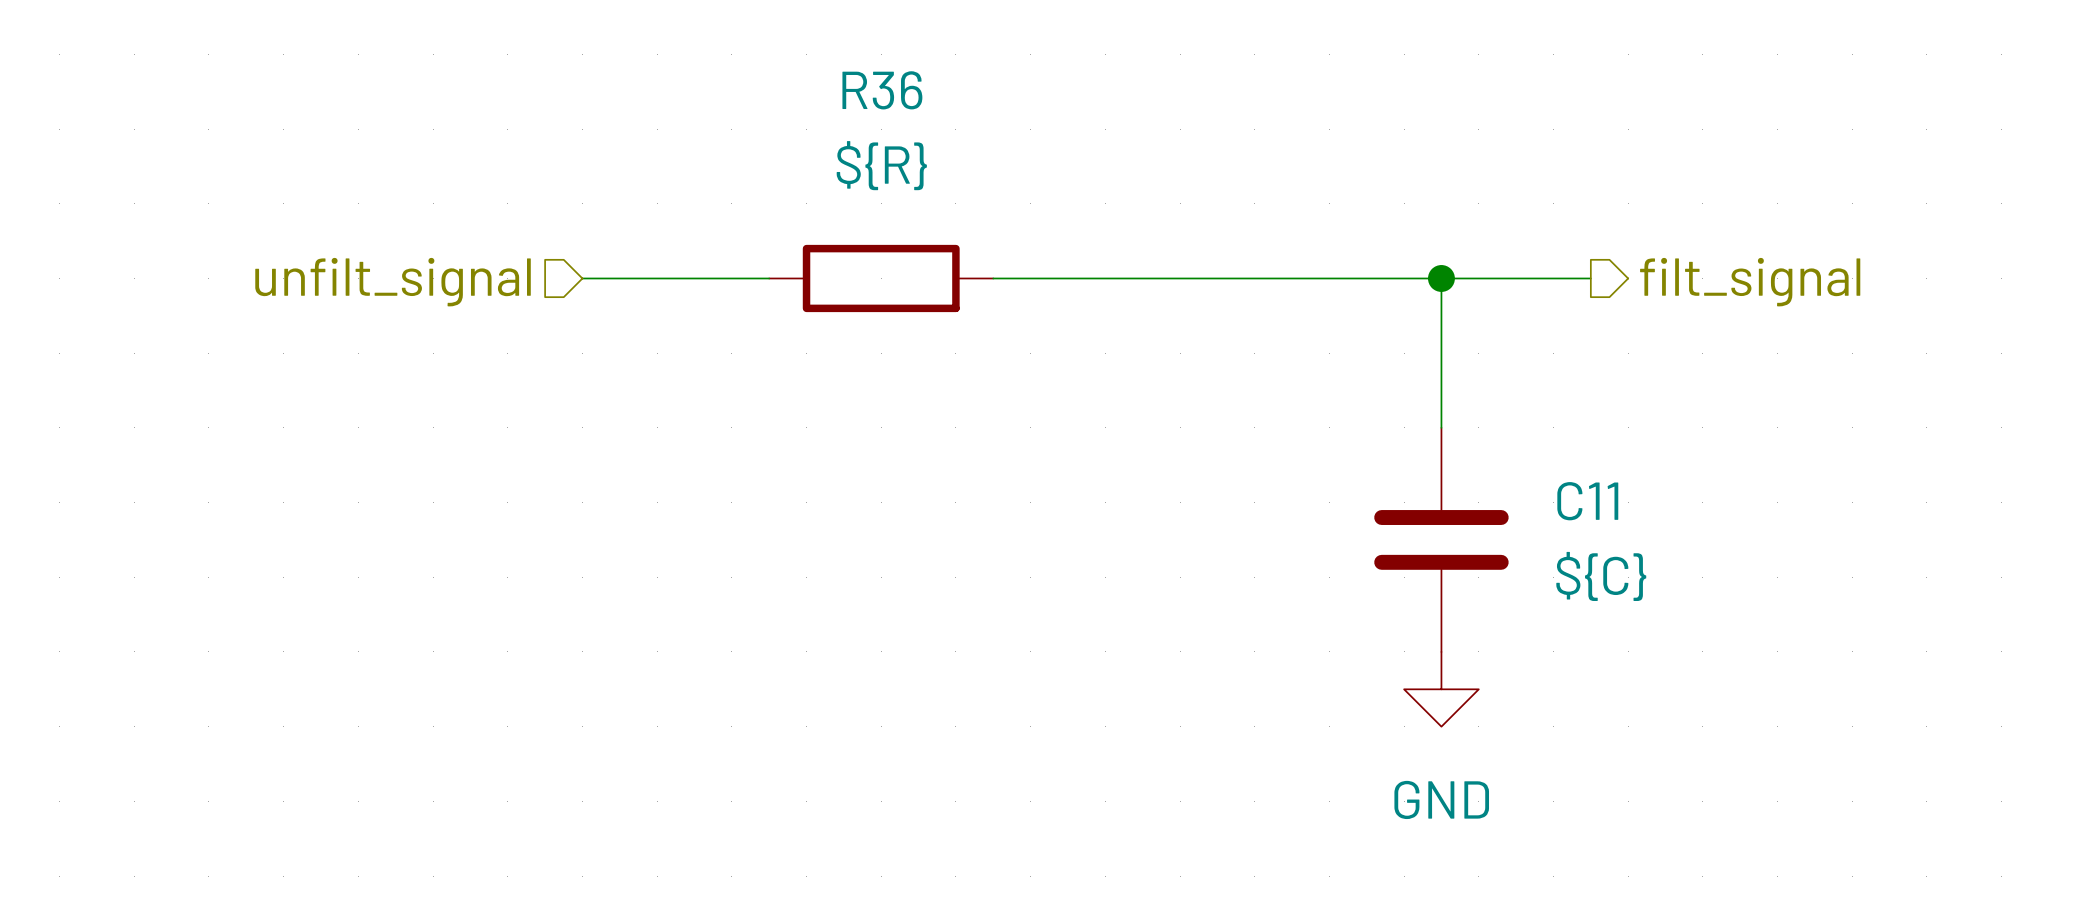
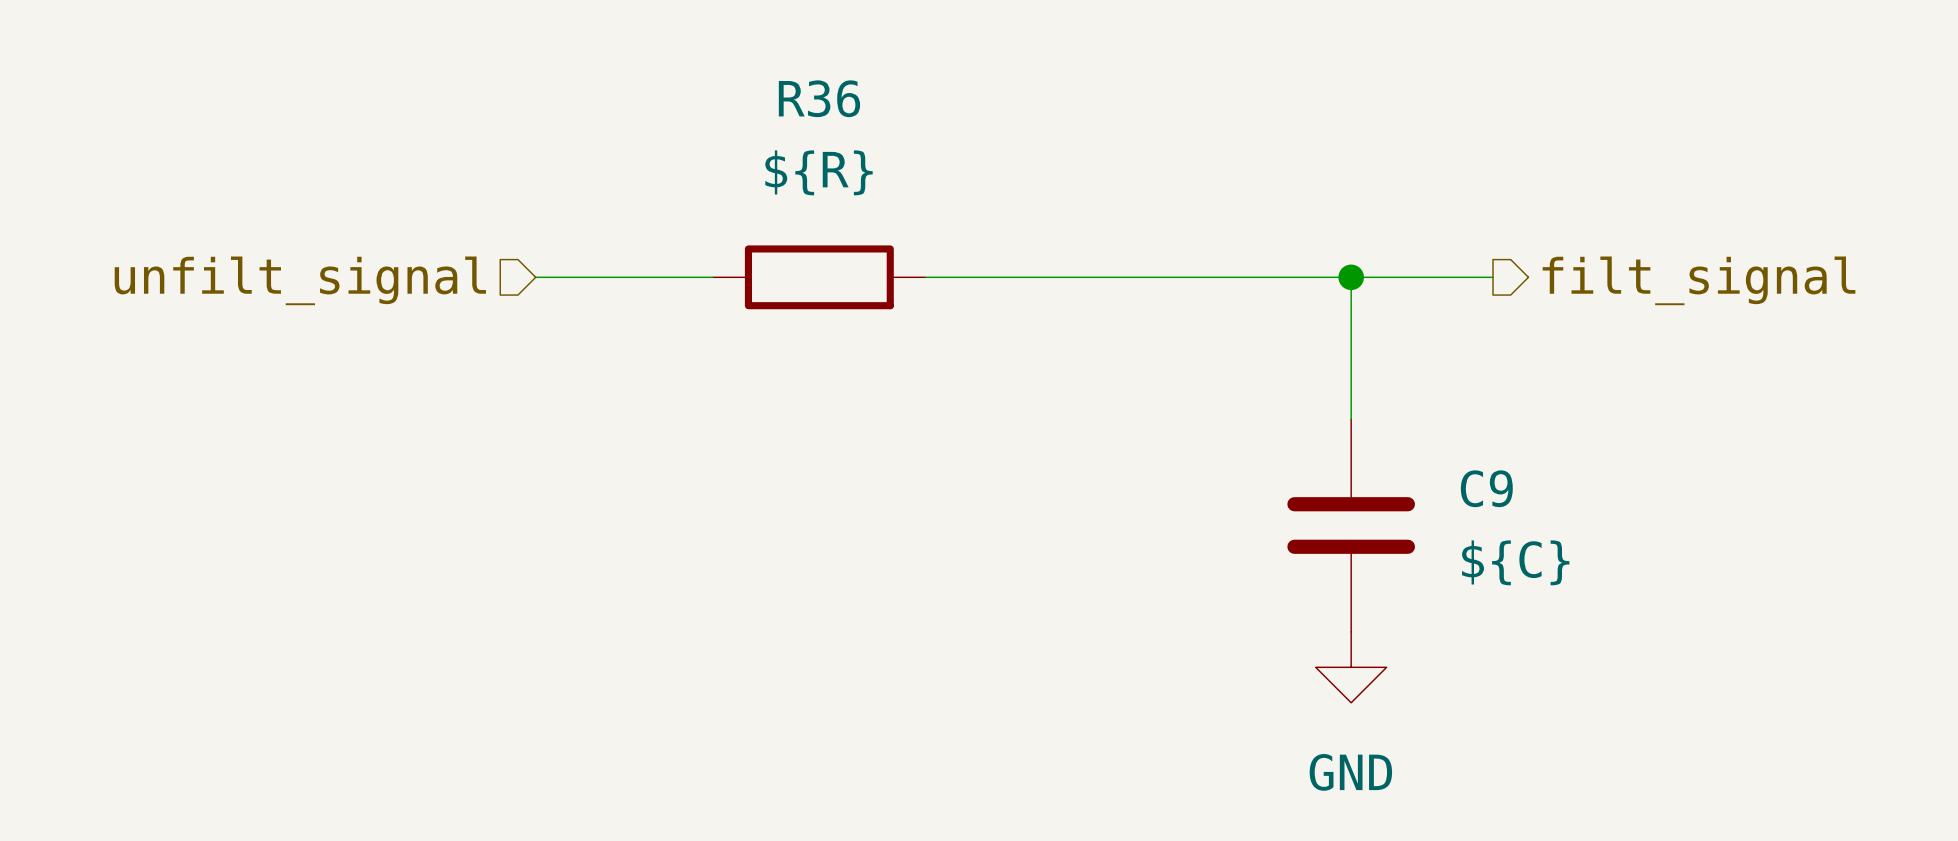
C11 name: C11 (1587, 501) -> C9 (1486, 488)

